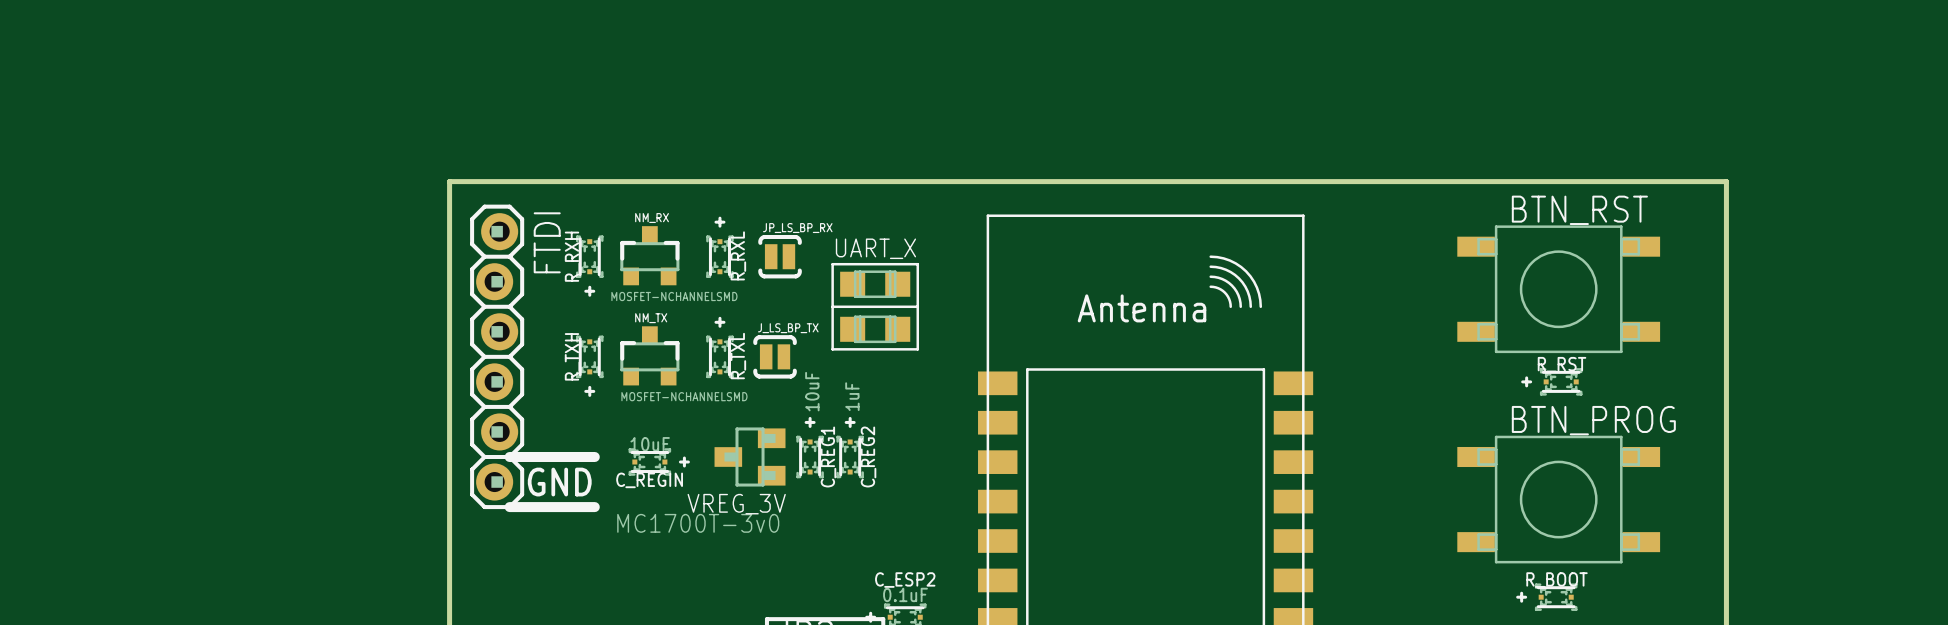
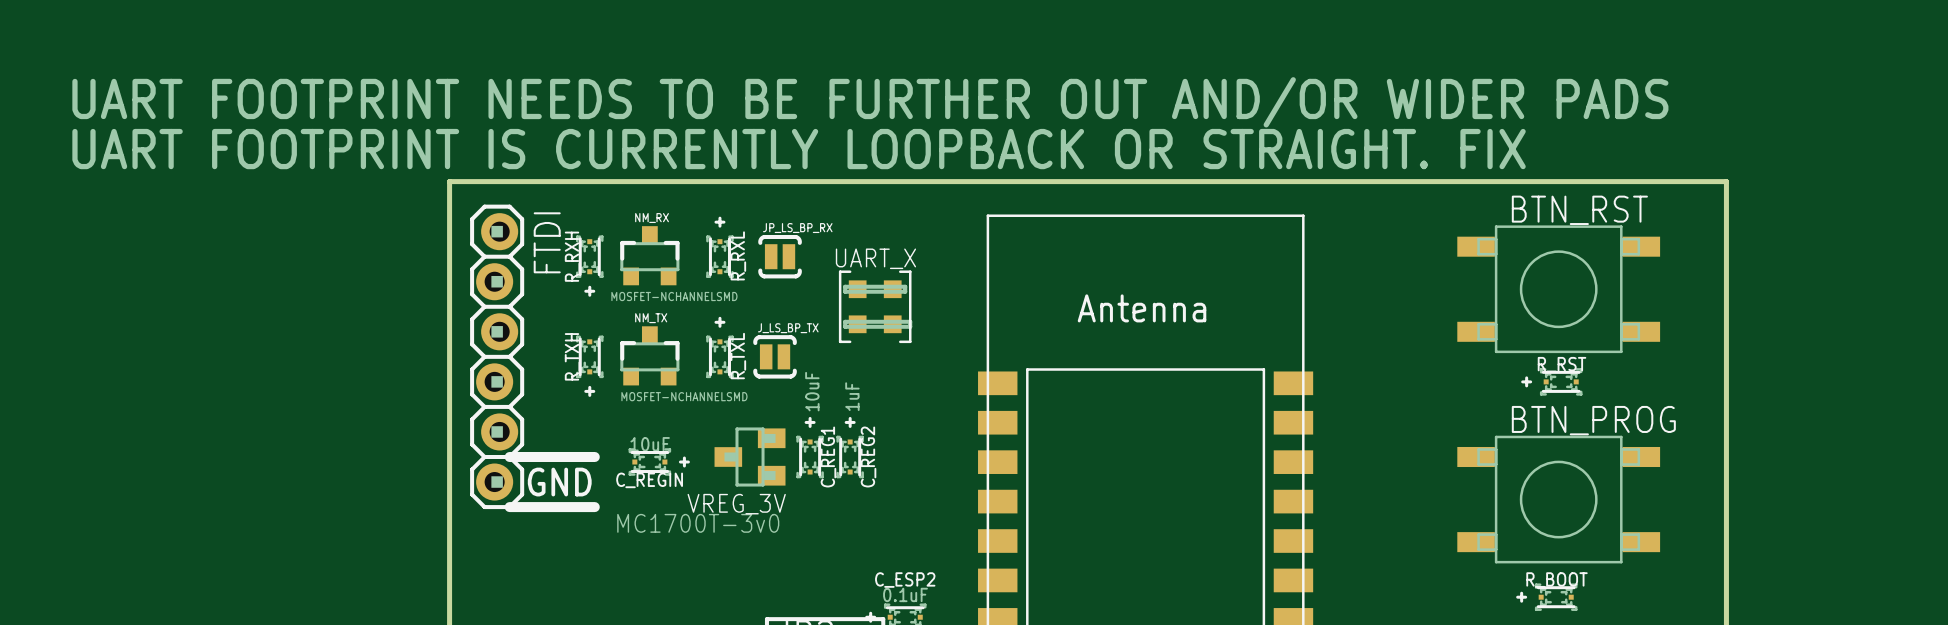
text: none -> UART FOOTPRINT NEEDS TO BE FURTHER OUT AND/OR WIDER PADS (870, 102)
text: none -> UART FOOTPRINT IS CURRENTLY LOOPBACK OR STRAIGHT. FIX (799, 149)
line: (1210, 256) (1229, 260) (1246, 271) (1256, 287) (1260, 306) -> none
UART_X footprint: [831, 262, 920, 351] -> [838, 270, 912, 344]
line: (1210, 266) (1226, 269) (1239, 278) (1247, 291) (1250, 306) -> none
line: (1210, 276) (1222, 279) (1231, 285) (1238, 295) (1240, 306) -> none
line: none -> (845, 286) (905, 286) (905, 291) (845, 291) (845, 286)
line: (1210, 286) (1218, 288) (1224, 292) (1229, 299) (1230, 306) -> none
line: none -> (845, 321) (845, 326) (910, 326) (910, 321) (845, 321)

